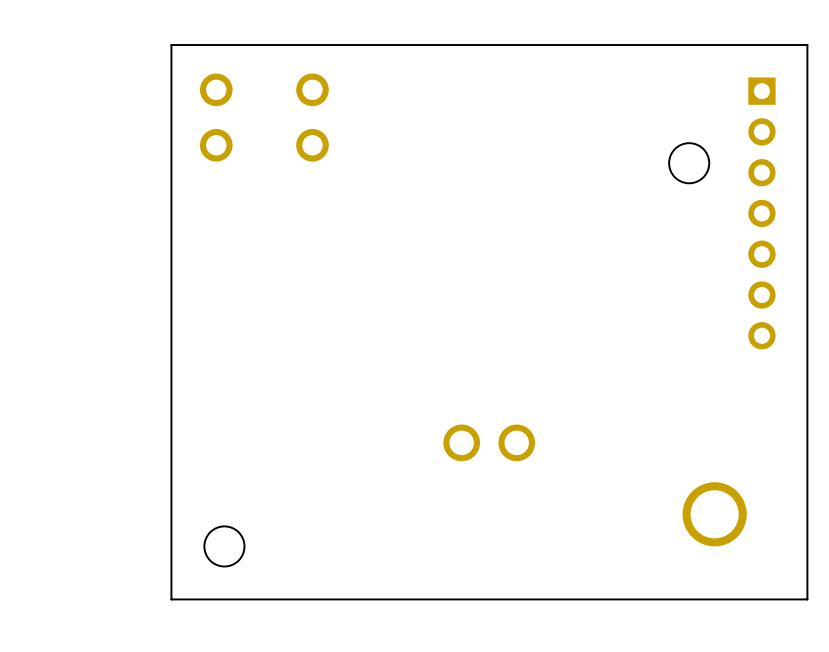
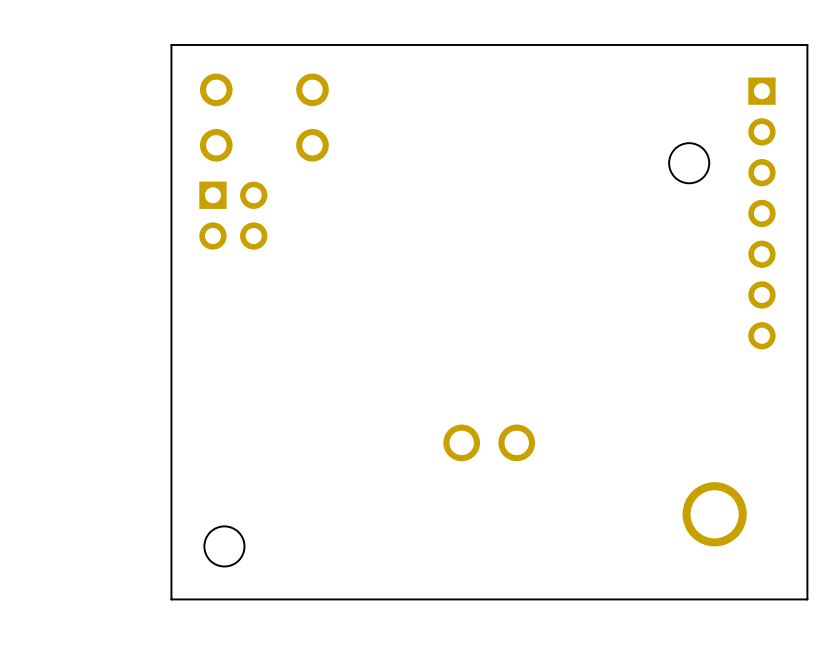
part: none -> (233, 215)

